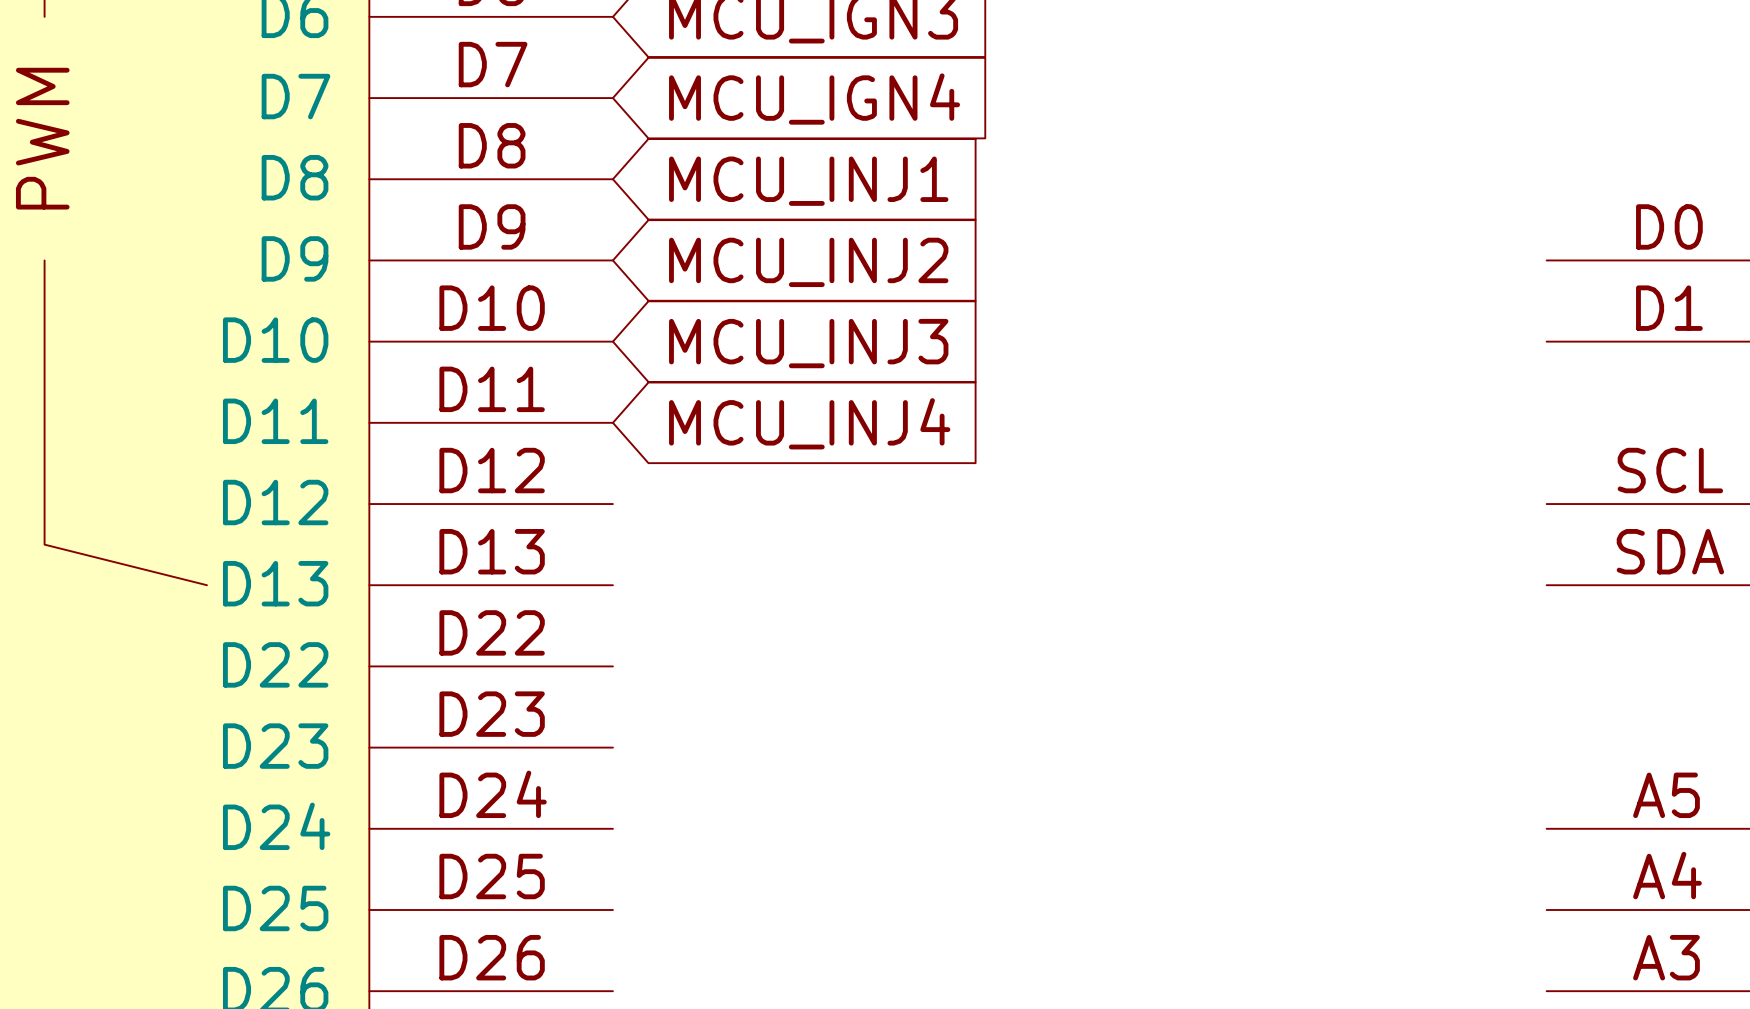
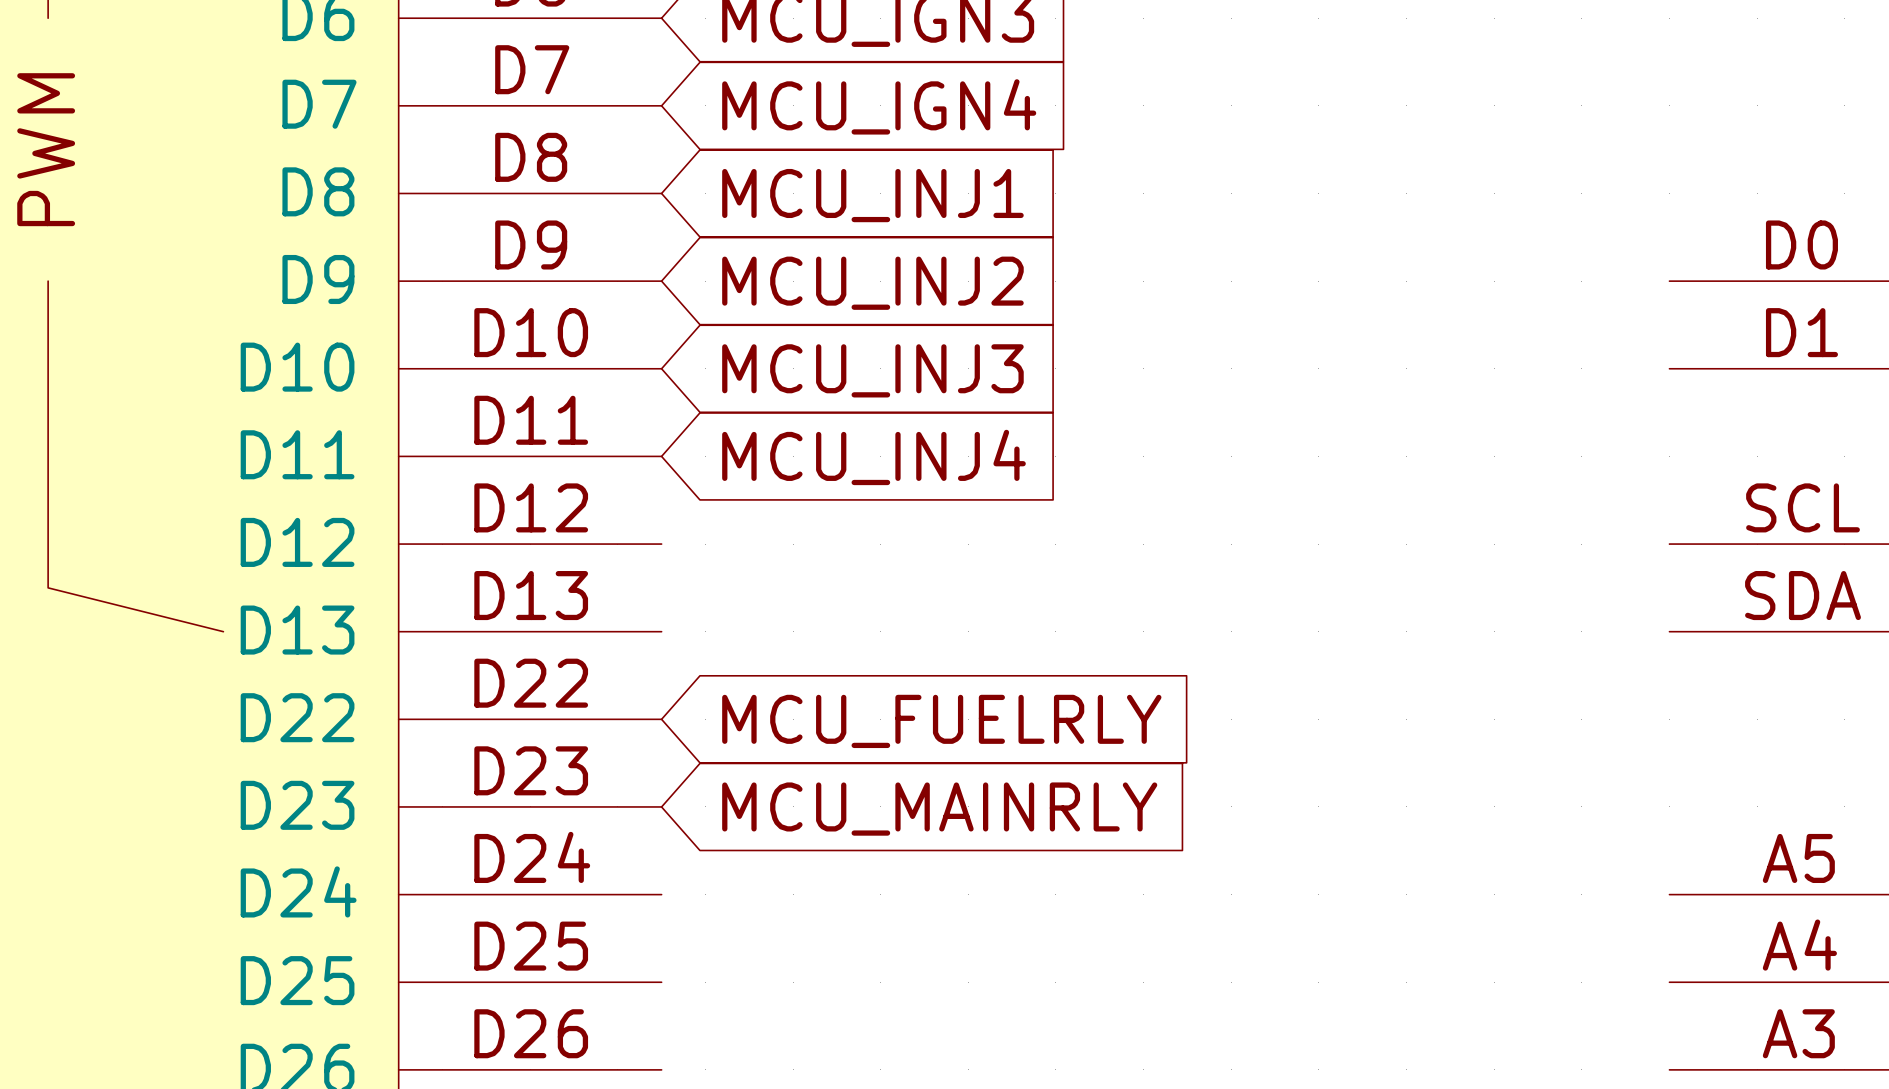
global label: none -> MCU_FUELRLY (941, 721)
global label: none -> MCU_MAINRLY (939, 809)

